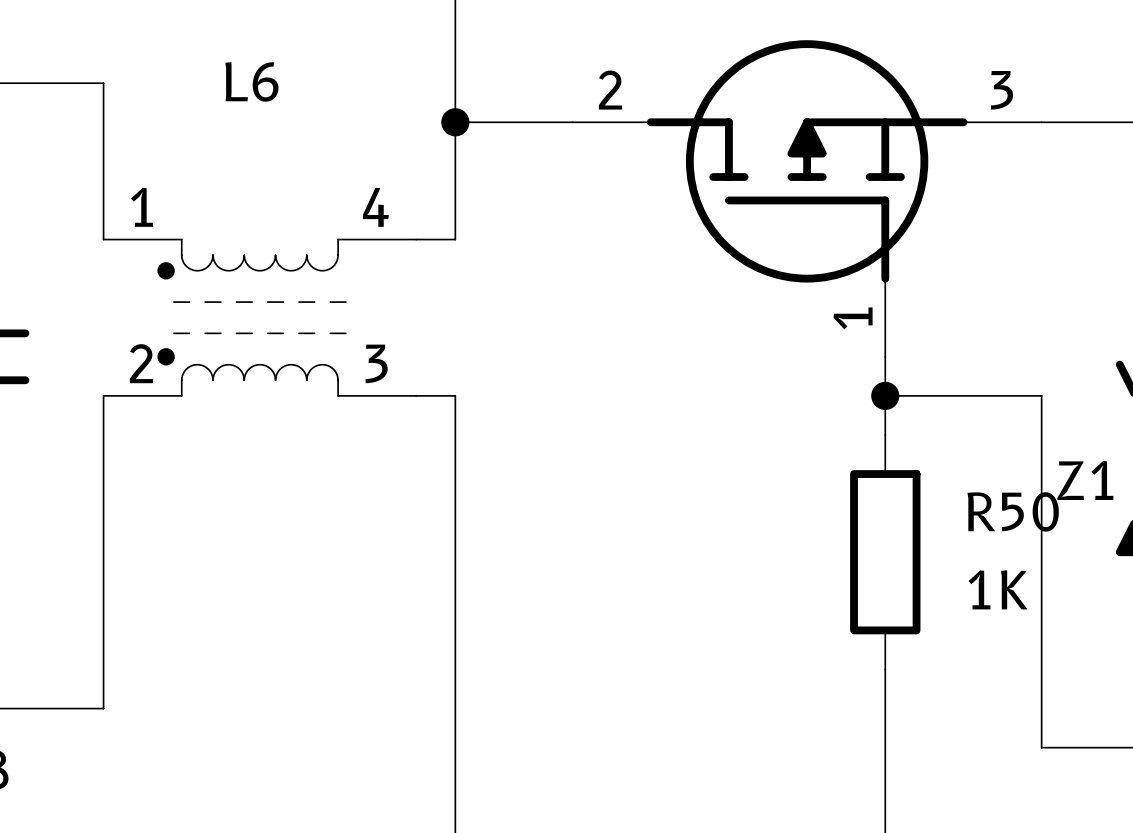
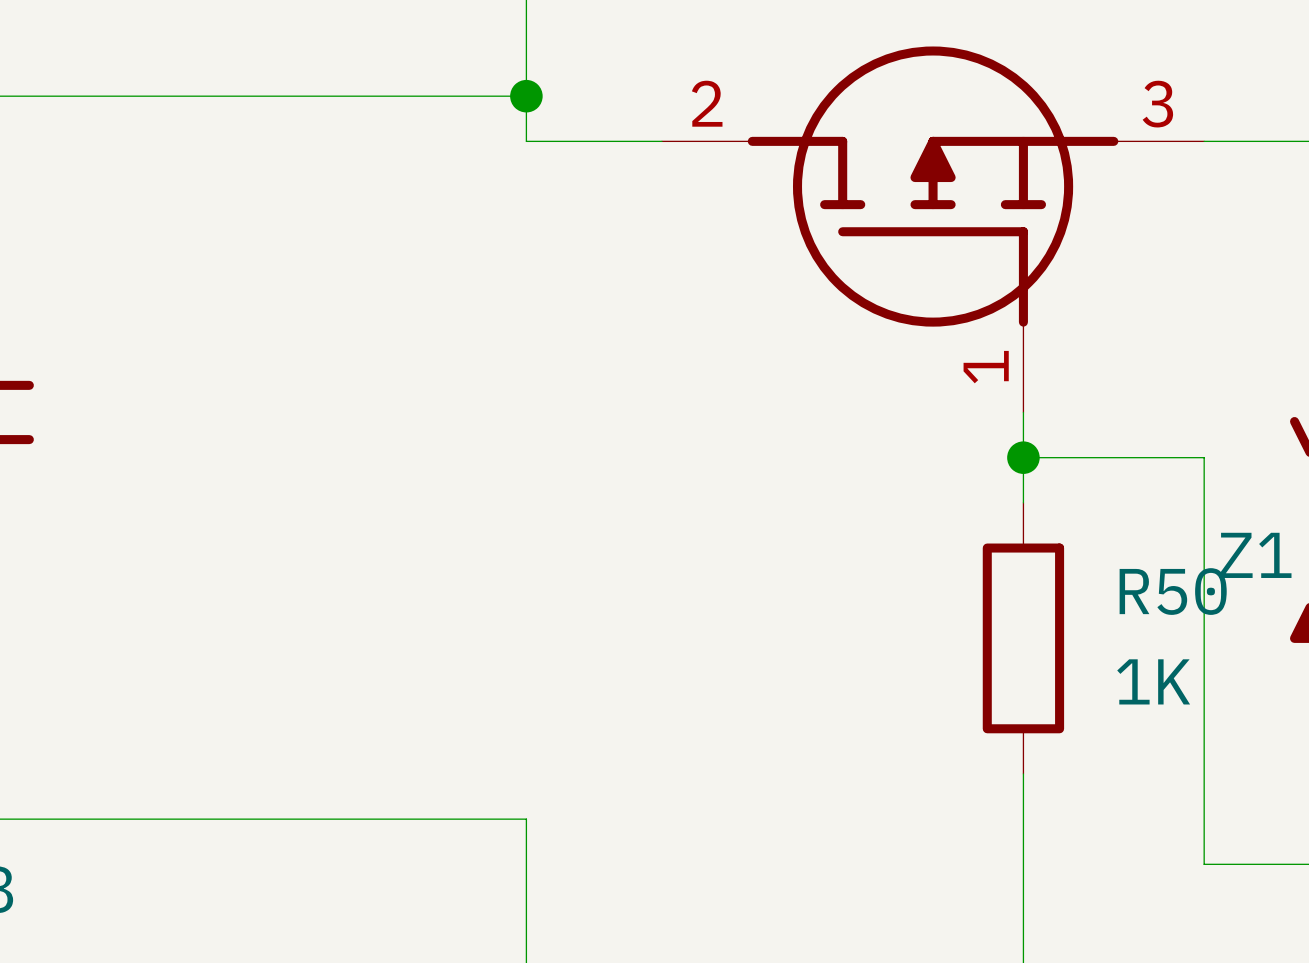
wire: (103, 83) (103, 239) -> (119, 96) (526, 96)
wire: (455, 122) (455, 239) (416, 239) -> none
junction position: (455, 122) -> (526, 96)
L6: (259, 317) -> none
wire: (103, 395) (103, 708) -> none
wire: (416, 395) (455, 395) (455, 708) -> (119, 819) (526, 819)

